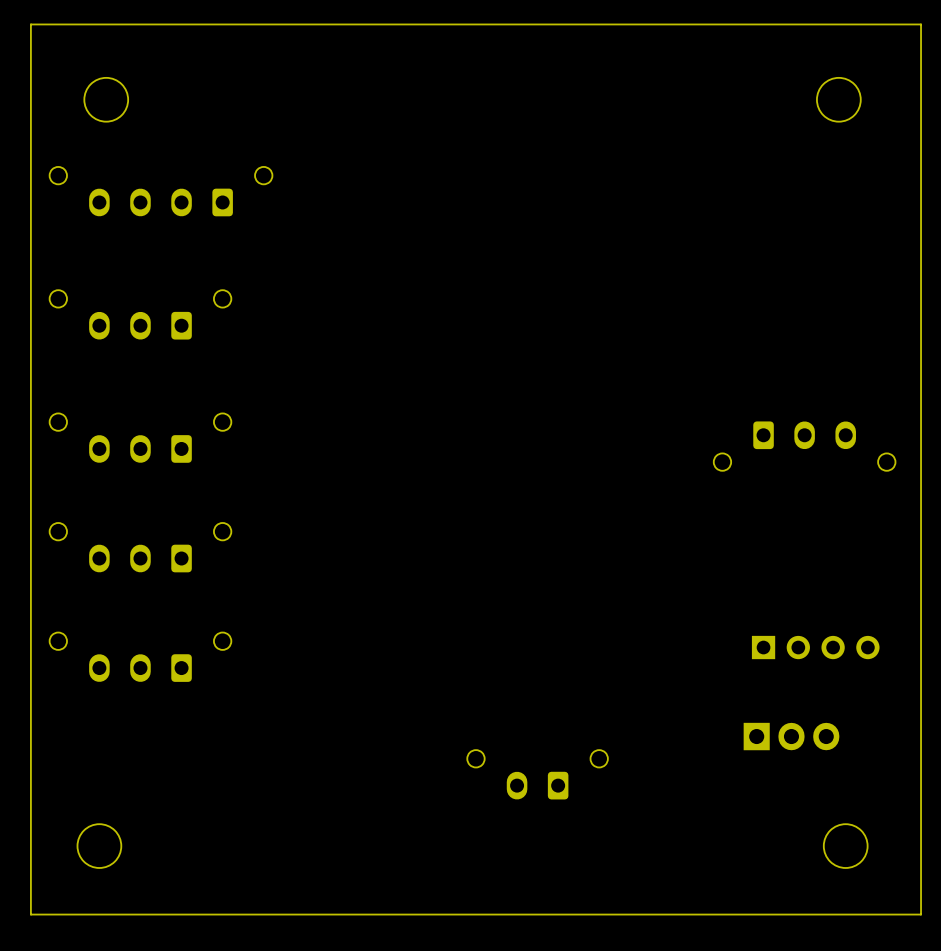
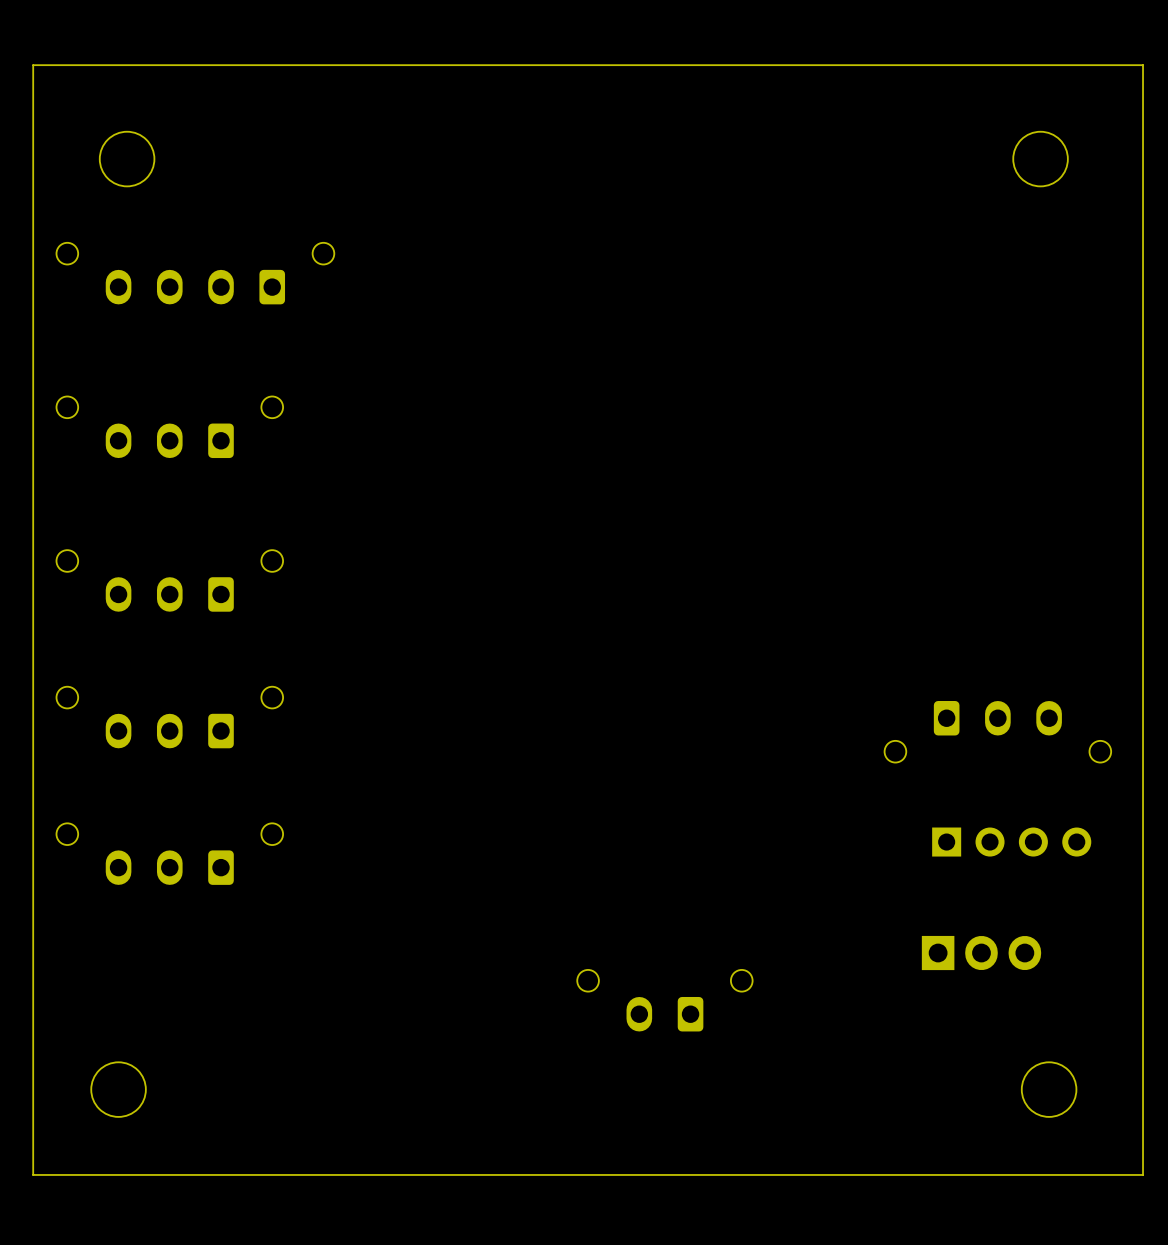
part position: (804, 446) -> (997, 731)

